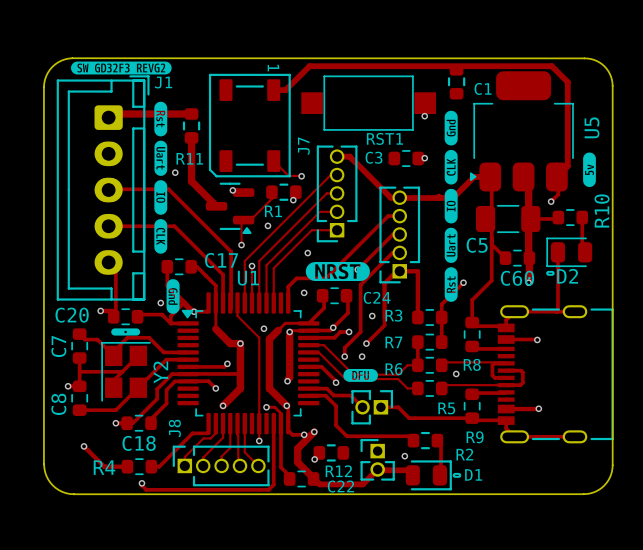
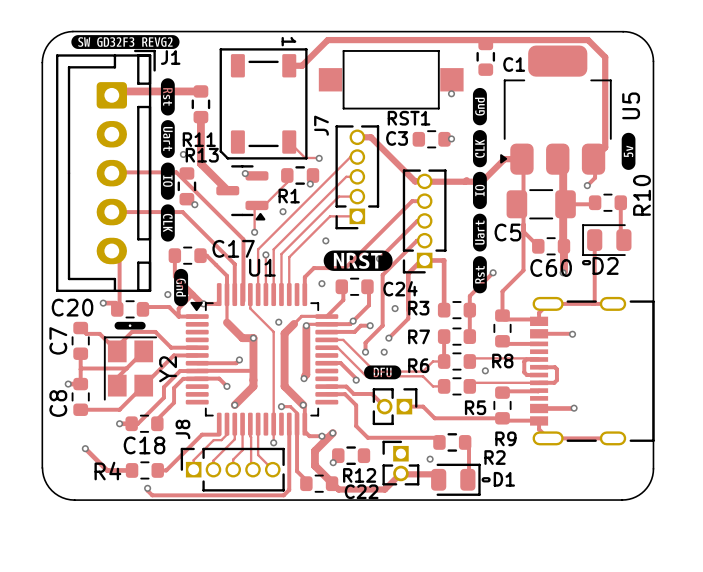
R13: none -> (186, 186)
via: none -> (194, 204)

